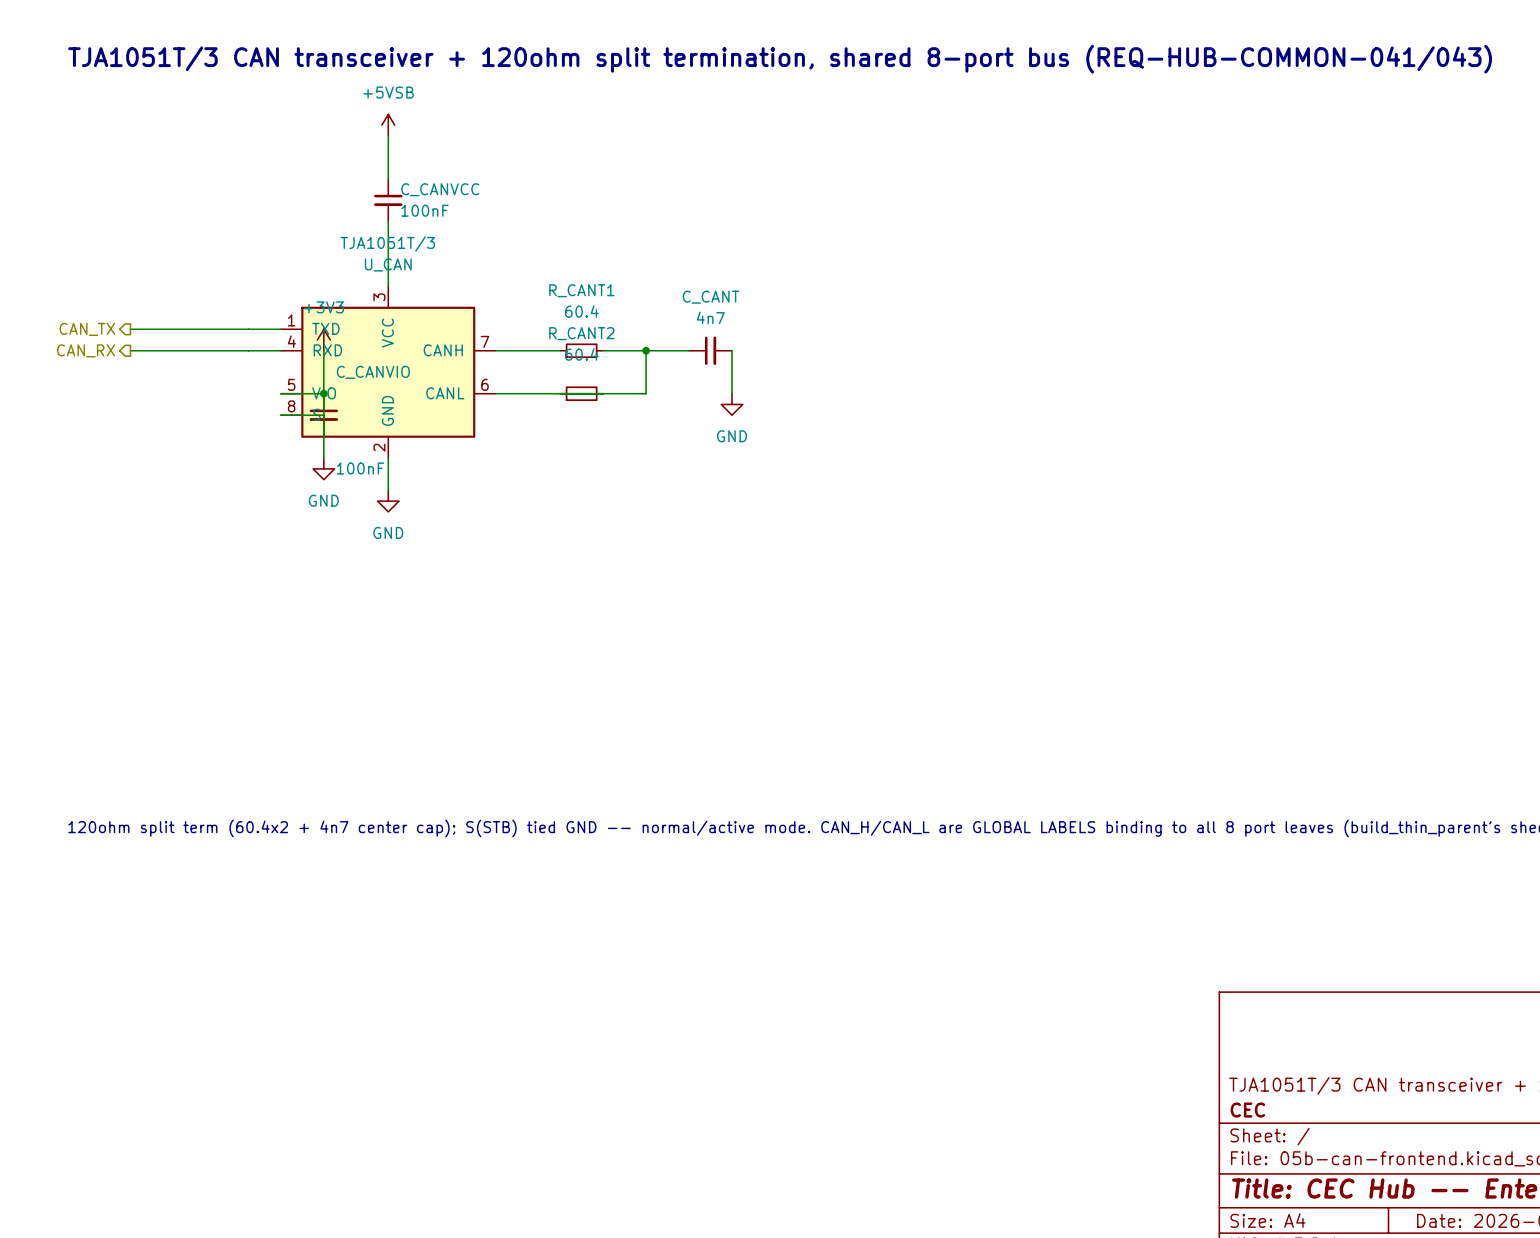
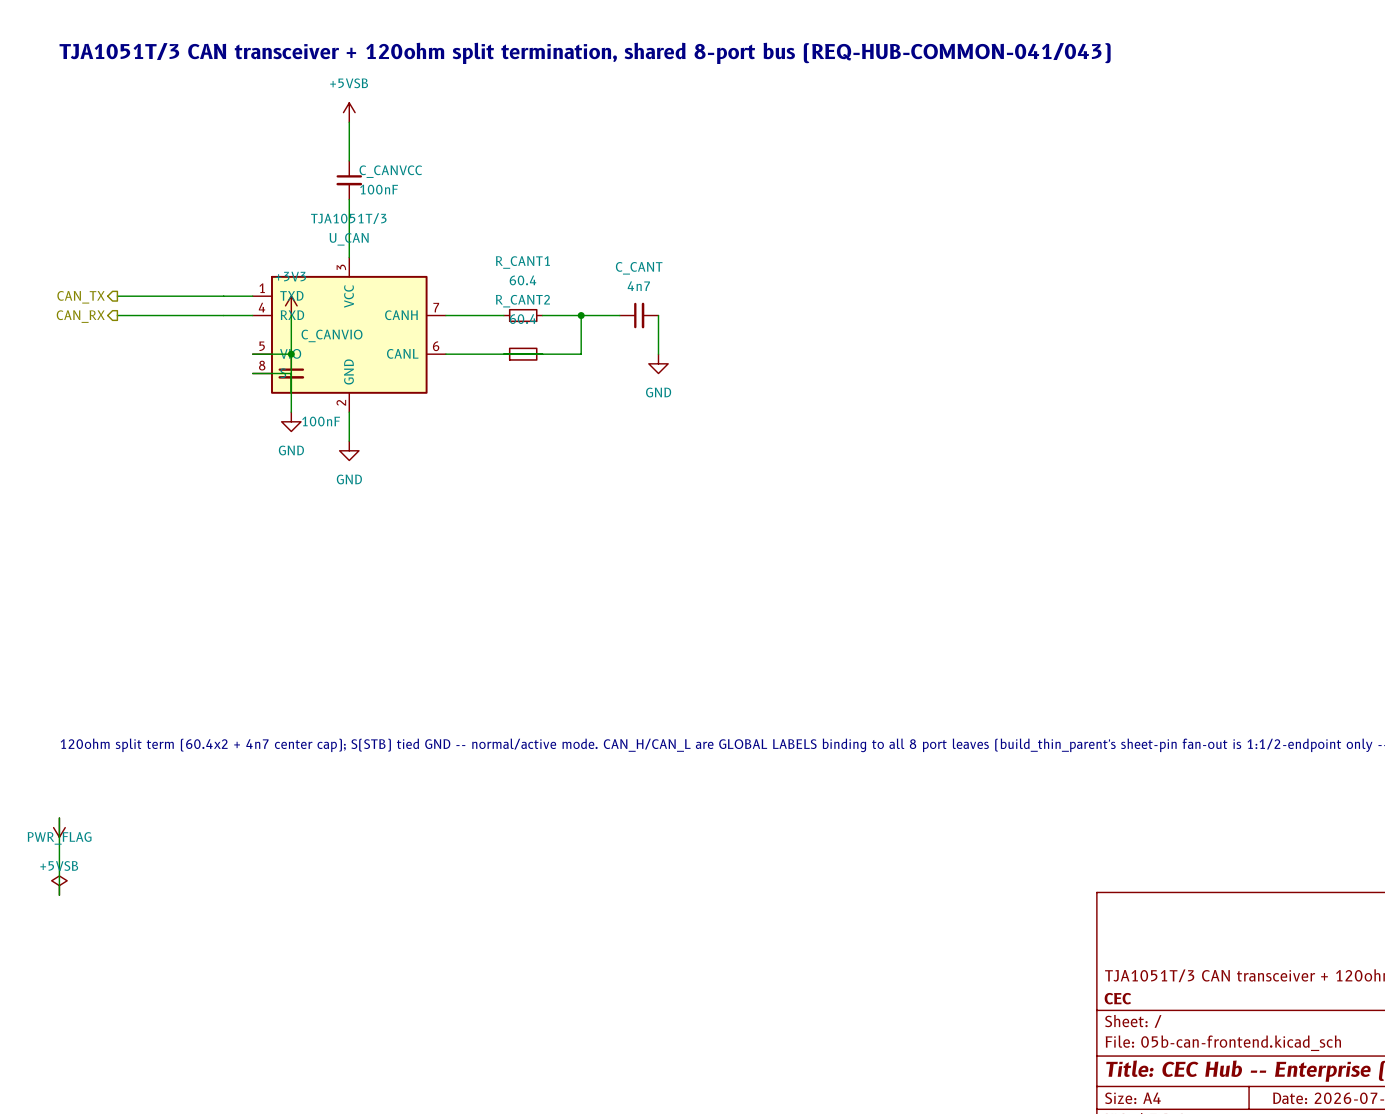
wire: none -> (59, 817) (59, 895)
power symbol: none -> +5VSB (59, 827)
power symbol: none -> PWR_FLAG (59, 885)

